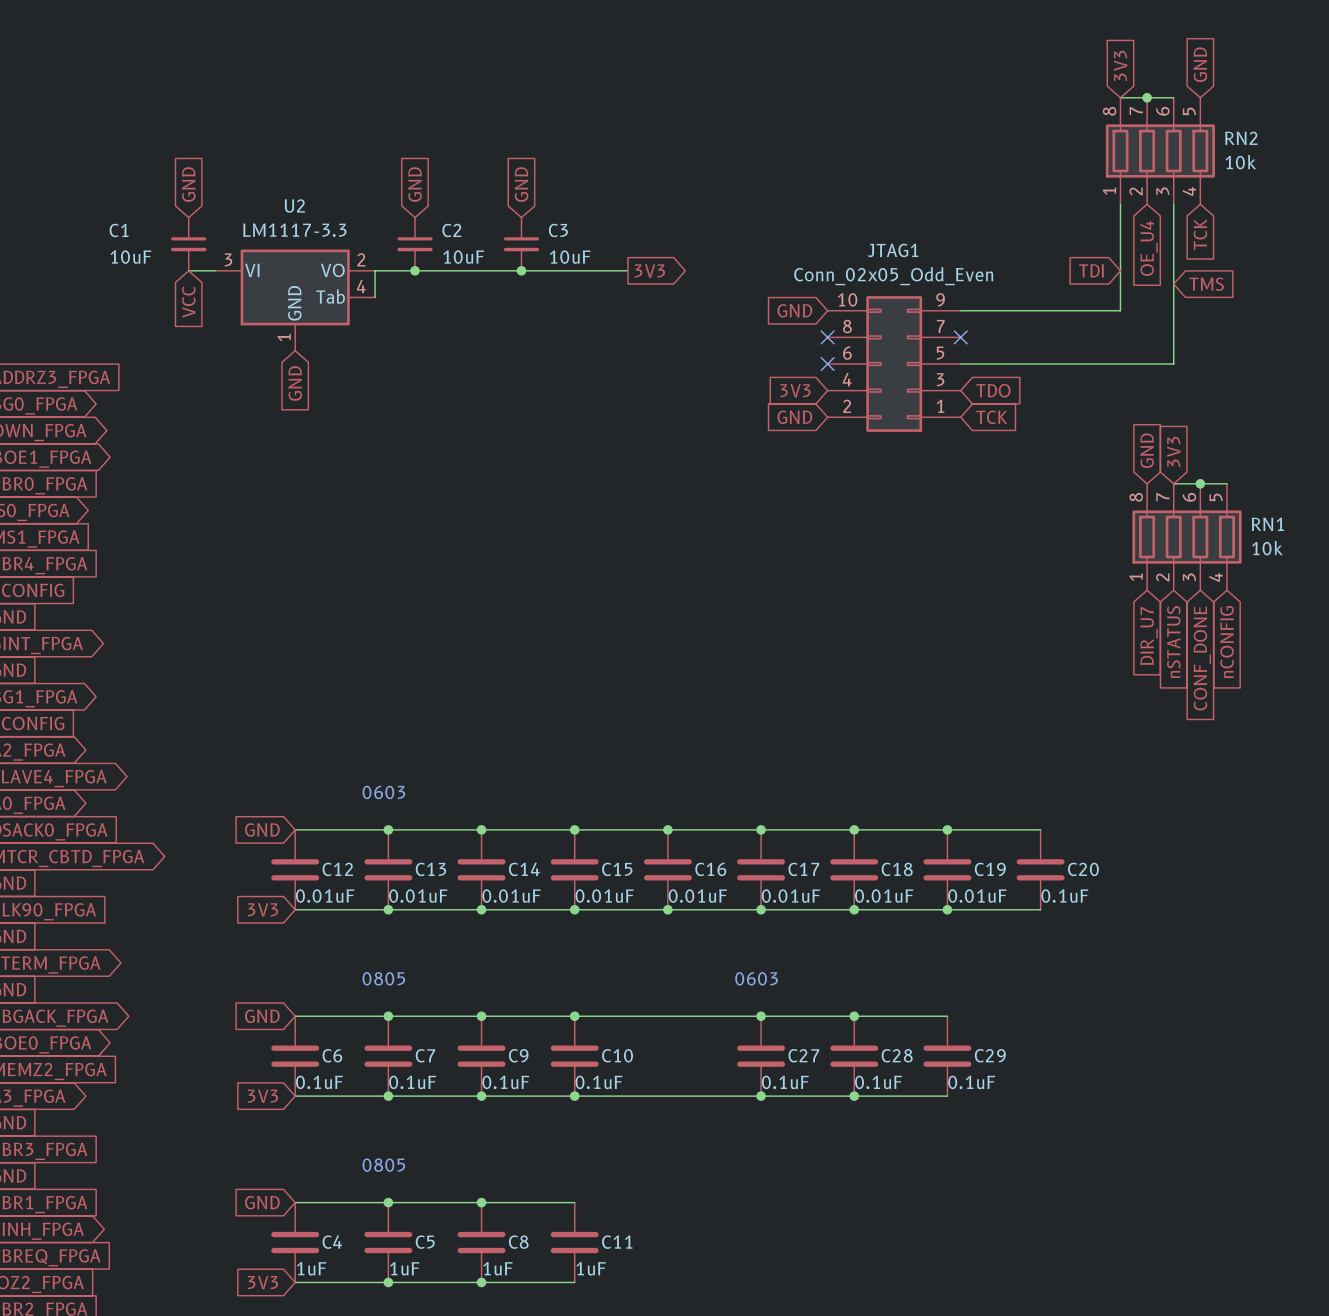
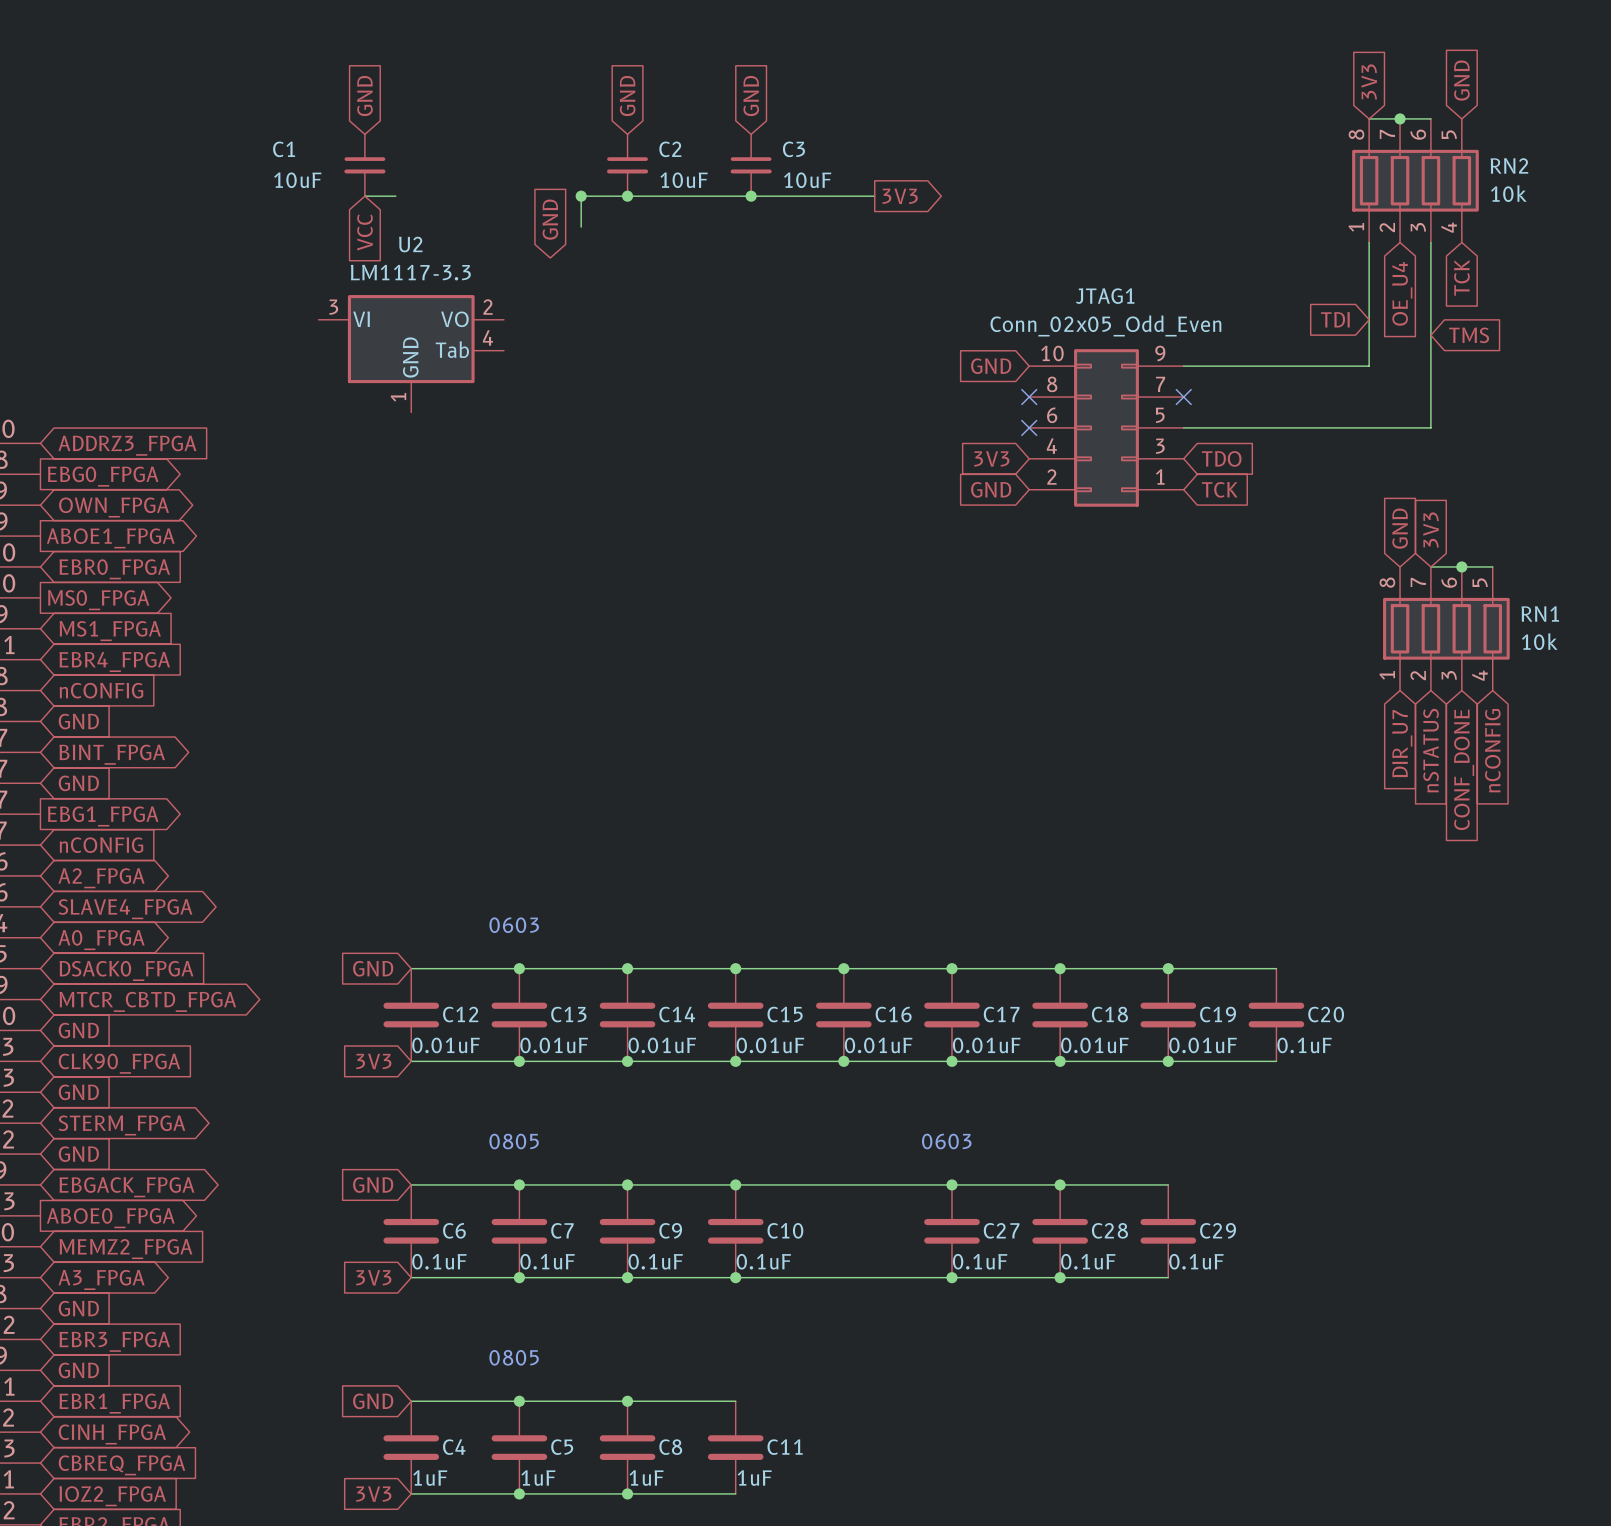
global label: none -> GND (364, 96)
global label: none -> GND (627, 96)
global label: none -> GND (751, 96)
junction: none -> (581, 196)
junction: none -> (627, 196)
junction: none -> (751, 196)
global label: GND (188, 184) -> none
global label: GND (521, 184) -> none
C1 position: (188, 244) -> (364, 165)
C2 position: (414, 244) -> (627, 165)
C3 position: (521, 244) -> (751, 165)
wire: (188, 270) (215, 270) -> (364, 196) (395, 196)
junction: (414, 270) -> none
junction: (521, 270) -> none
wire: (627, 270) (375, 270) (375, 297) -> (874, 196) (581, 196) (581, 227)
global label position: 3V3 (649, 270) -> 3V3 (900, 196)
global label position: VCC (188, 302) -> VCC (365, 232)
global label: GND (295, 383) -> none

